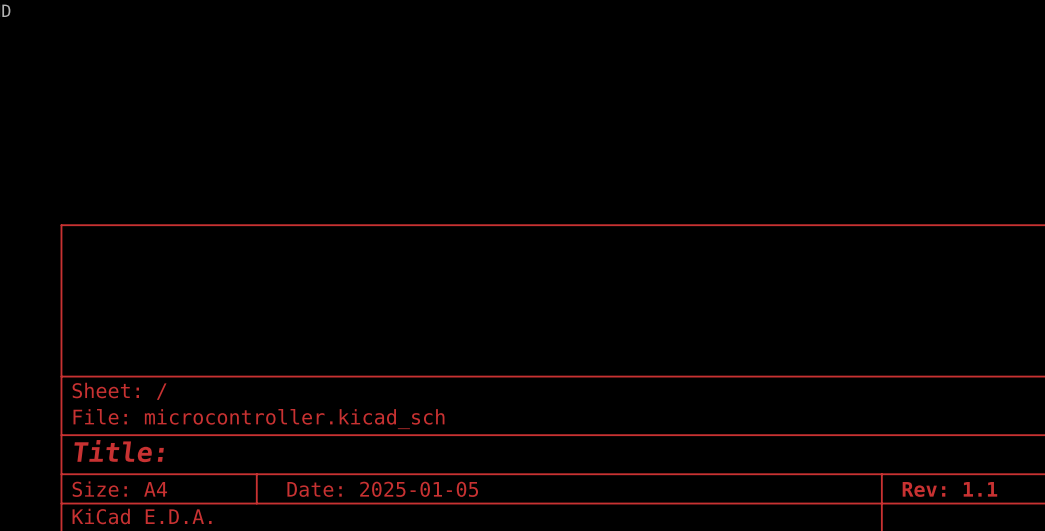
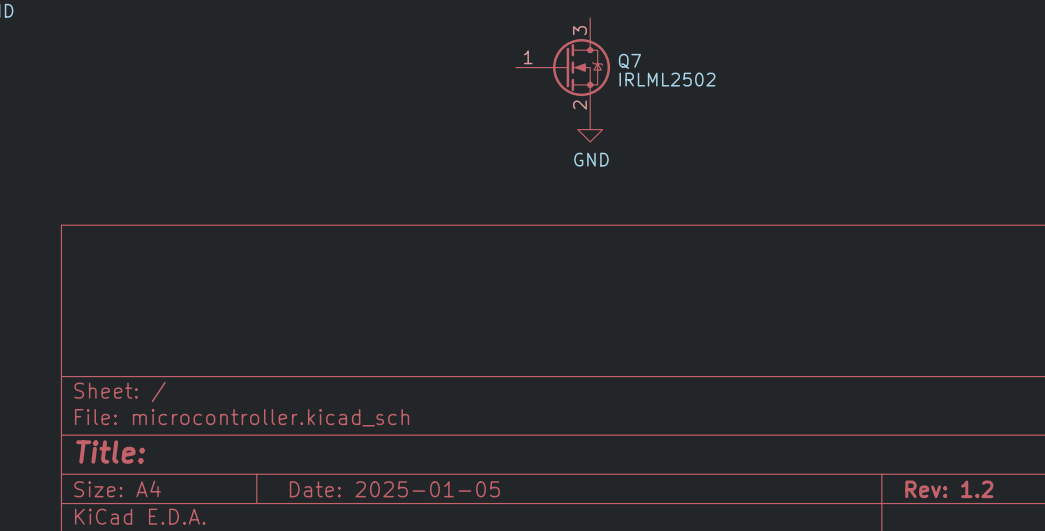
Q7: none -> IRLML2502 (562, 67)
power symbol: none -> GND (590, 129)
title block: Rev: 1.1 (949, 489) -> Rev: 1.2 (949, 489)

